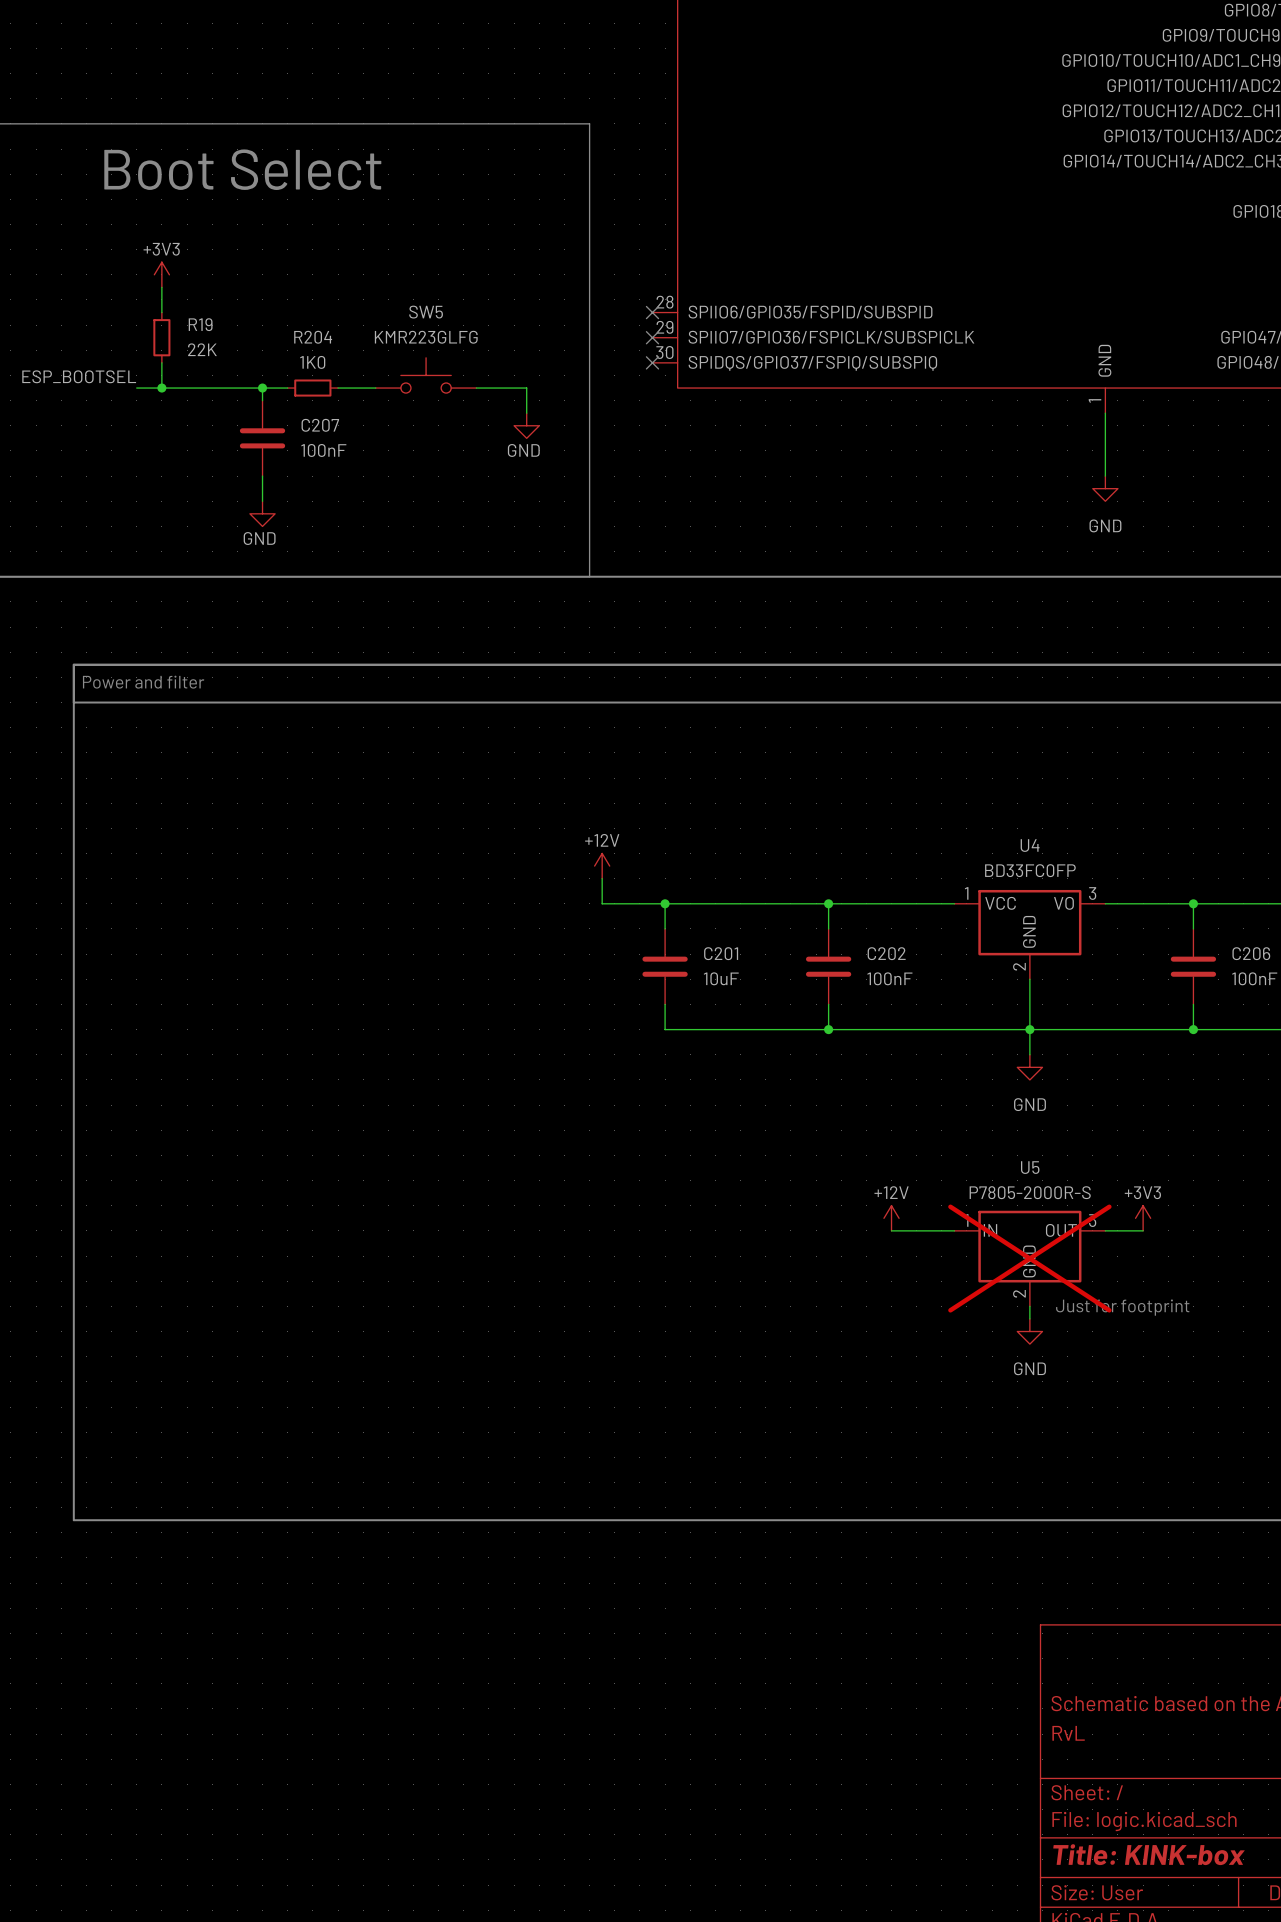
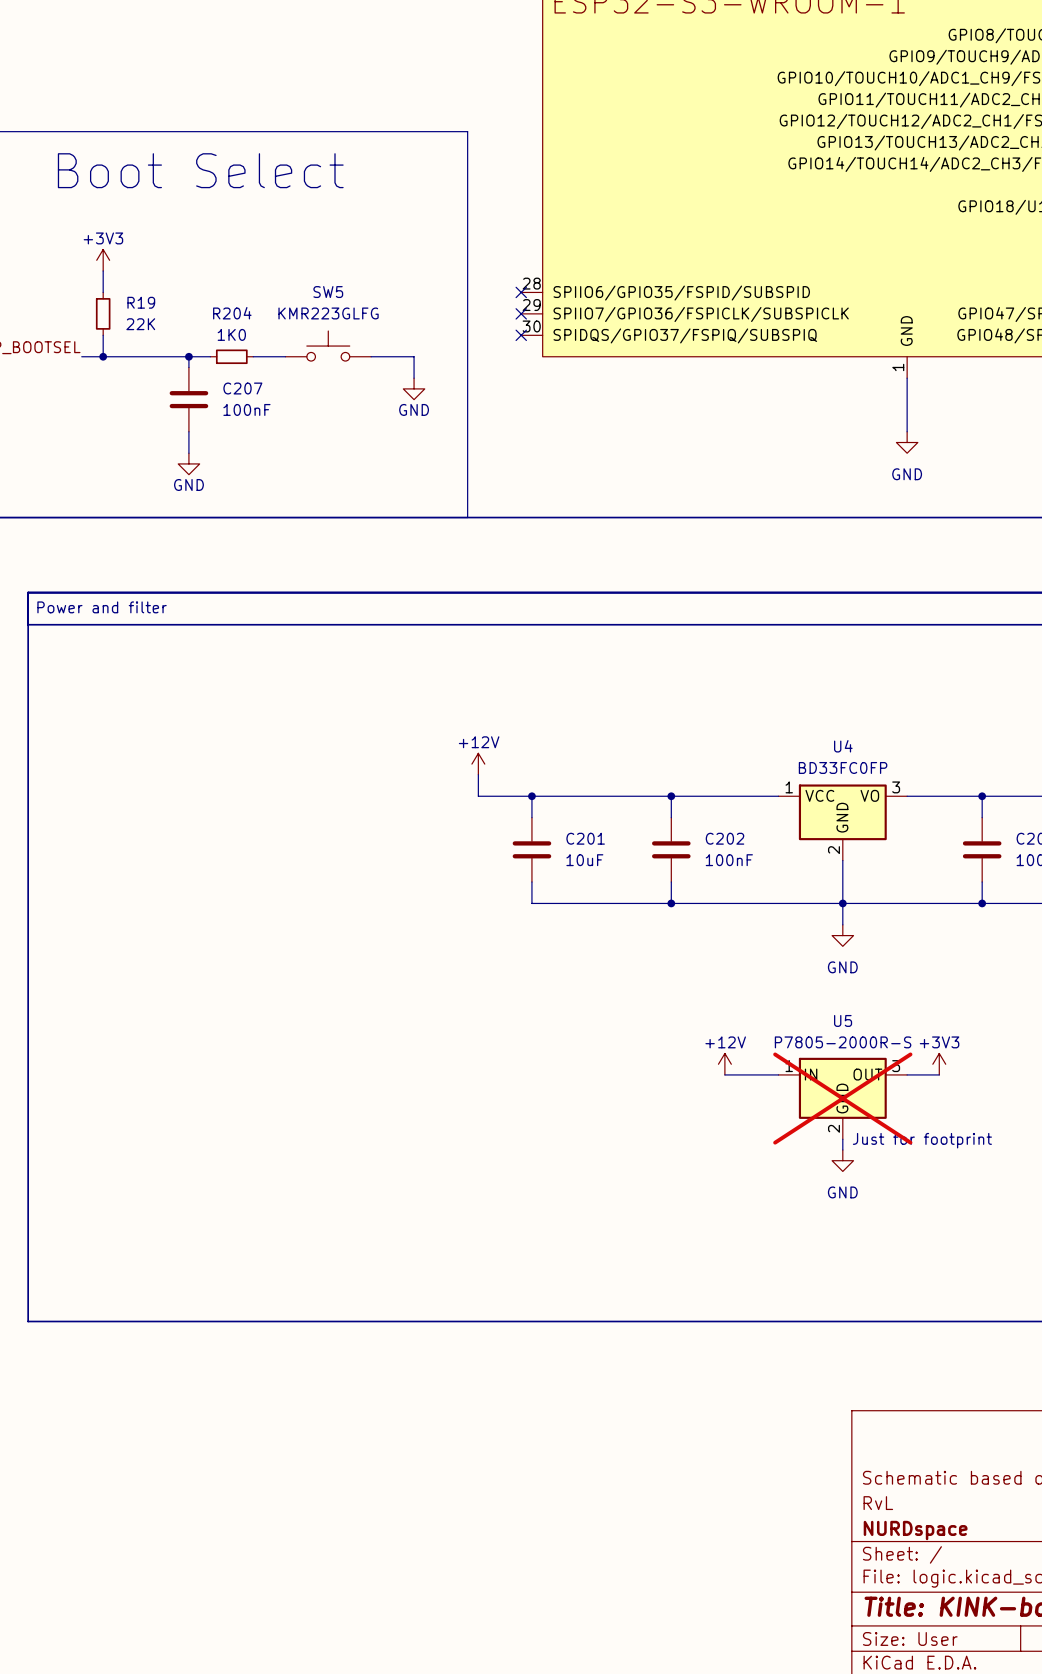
title block: none -> NURDspace (915, 1530)

